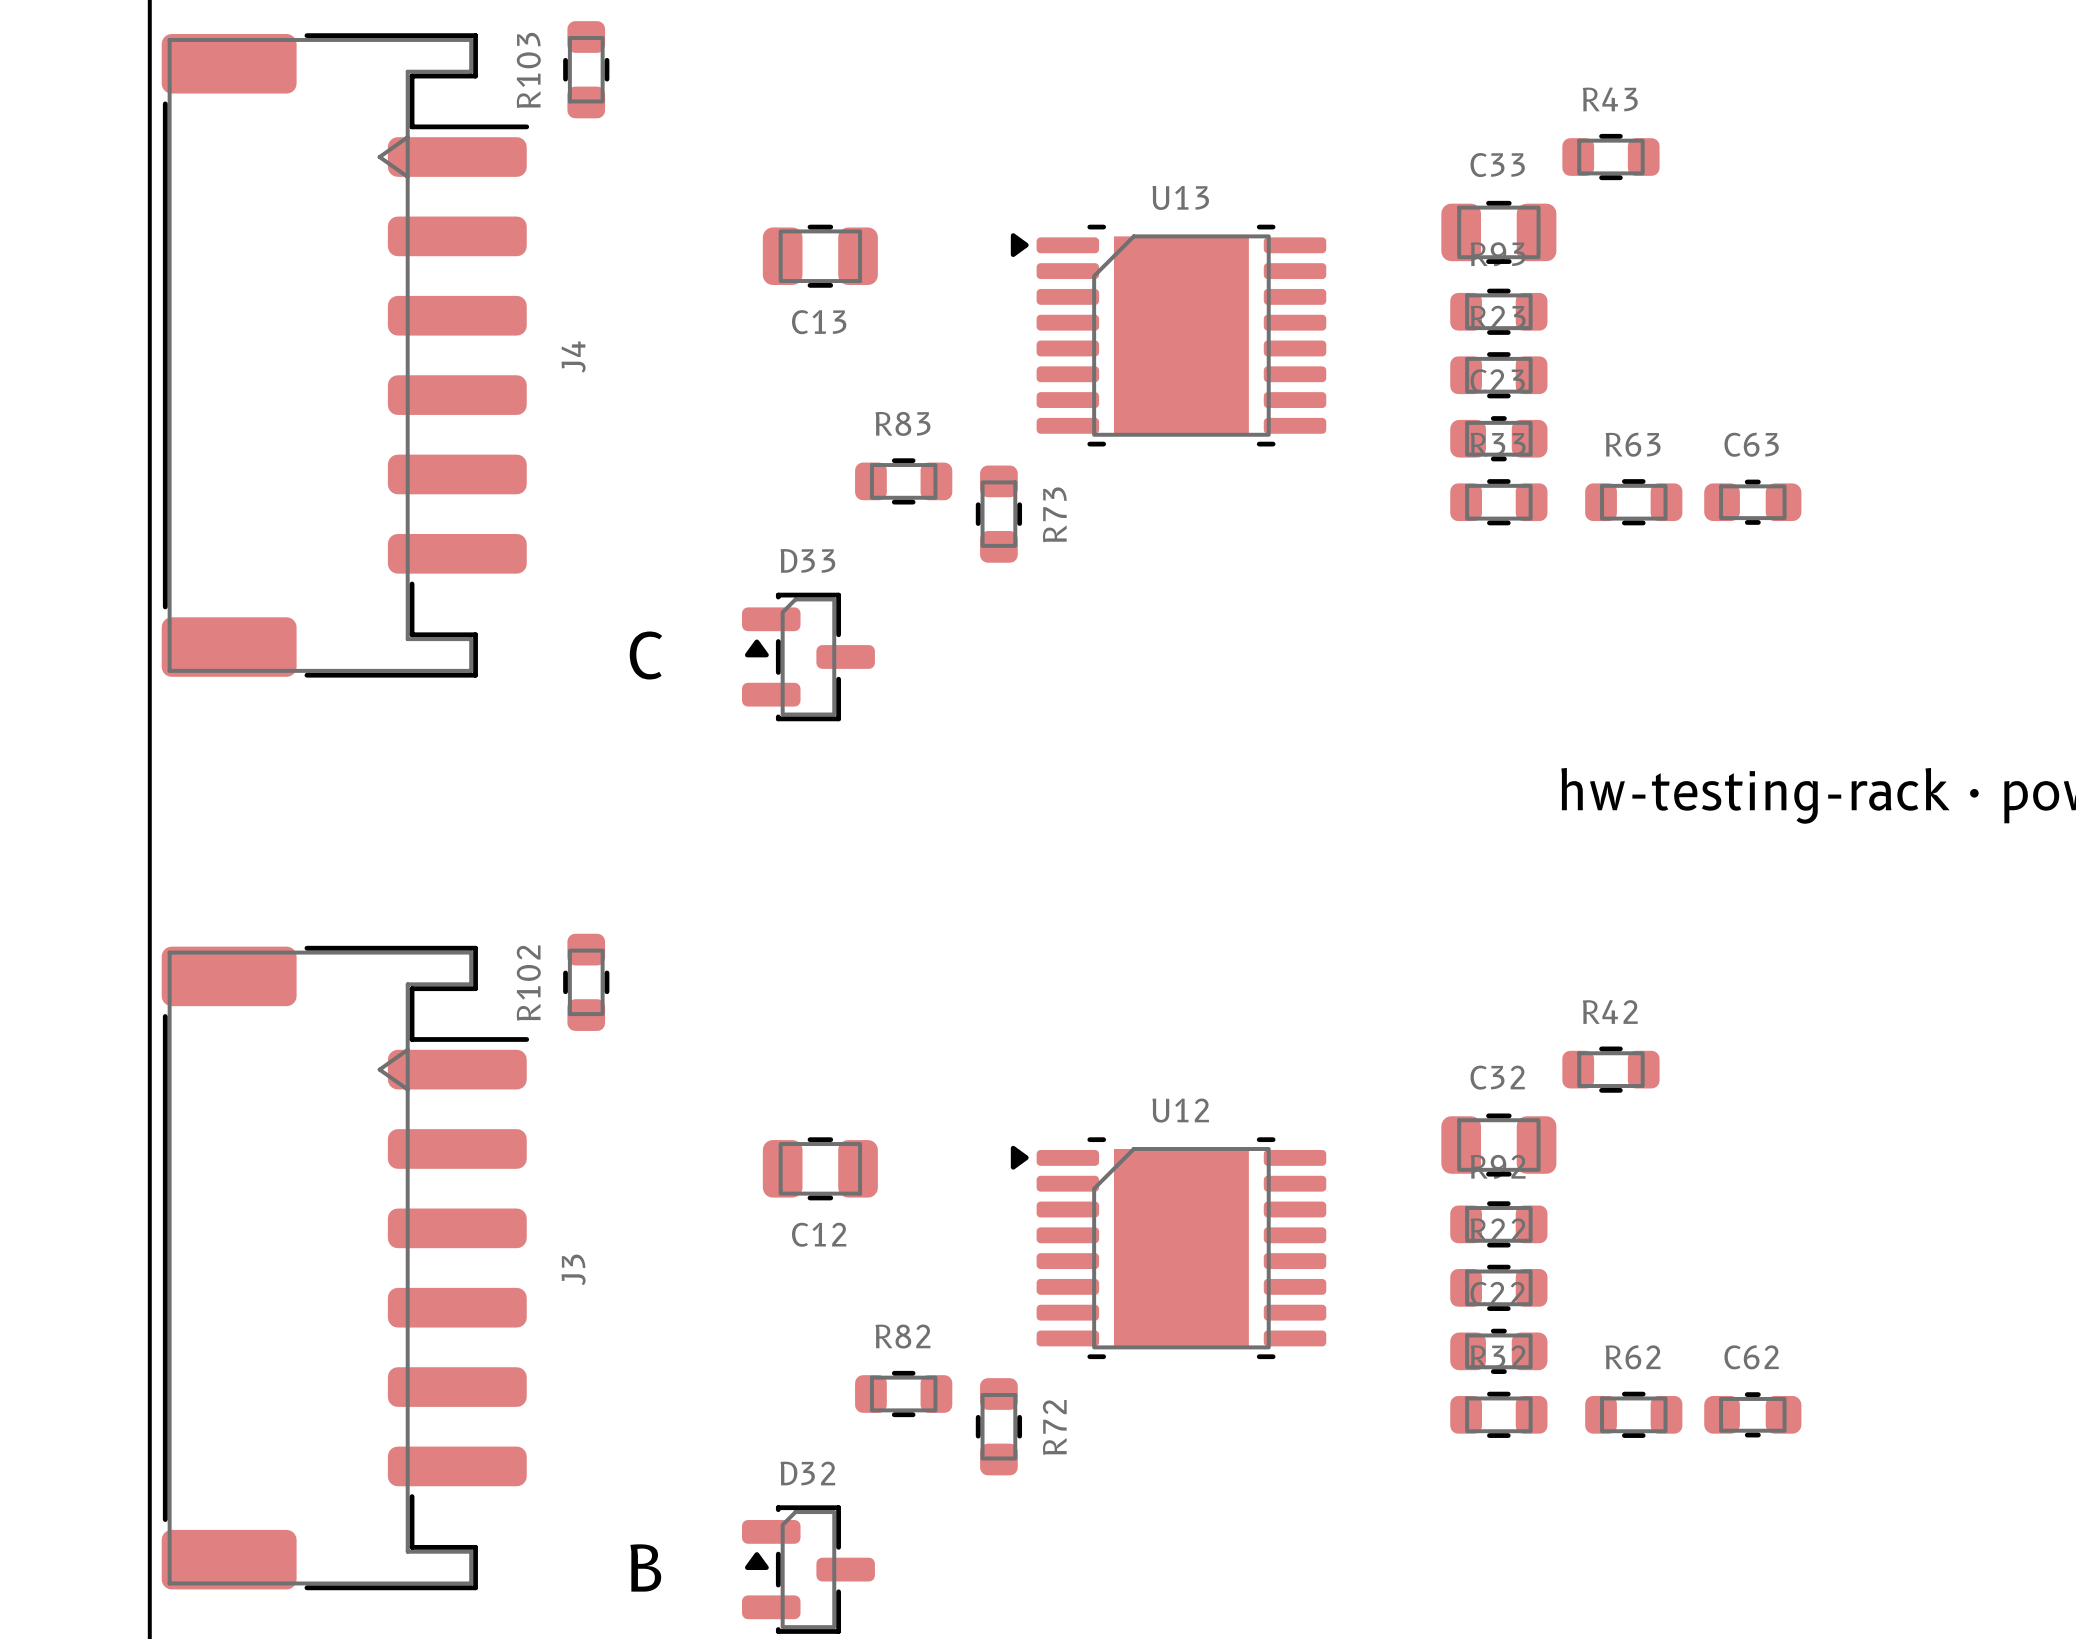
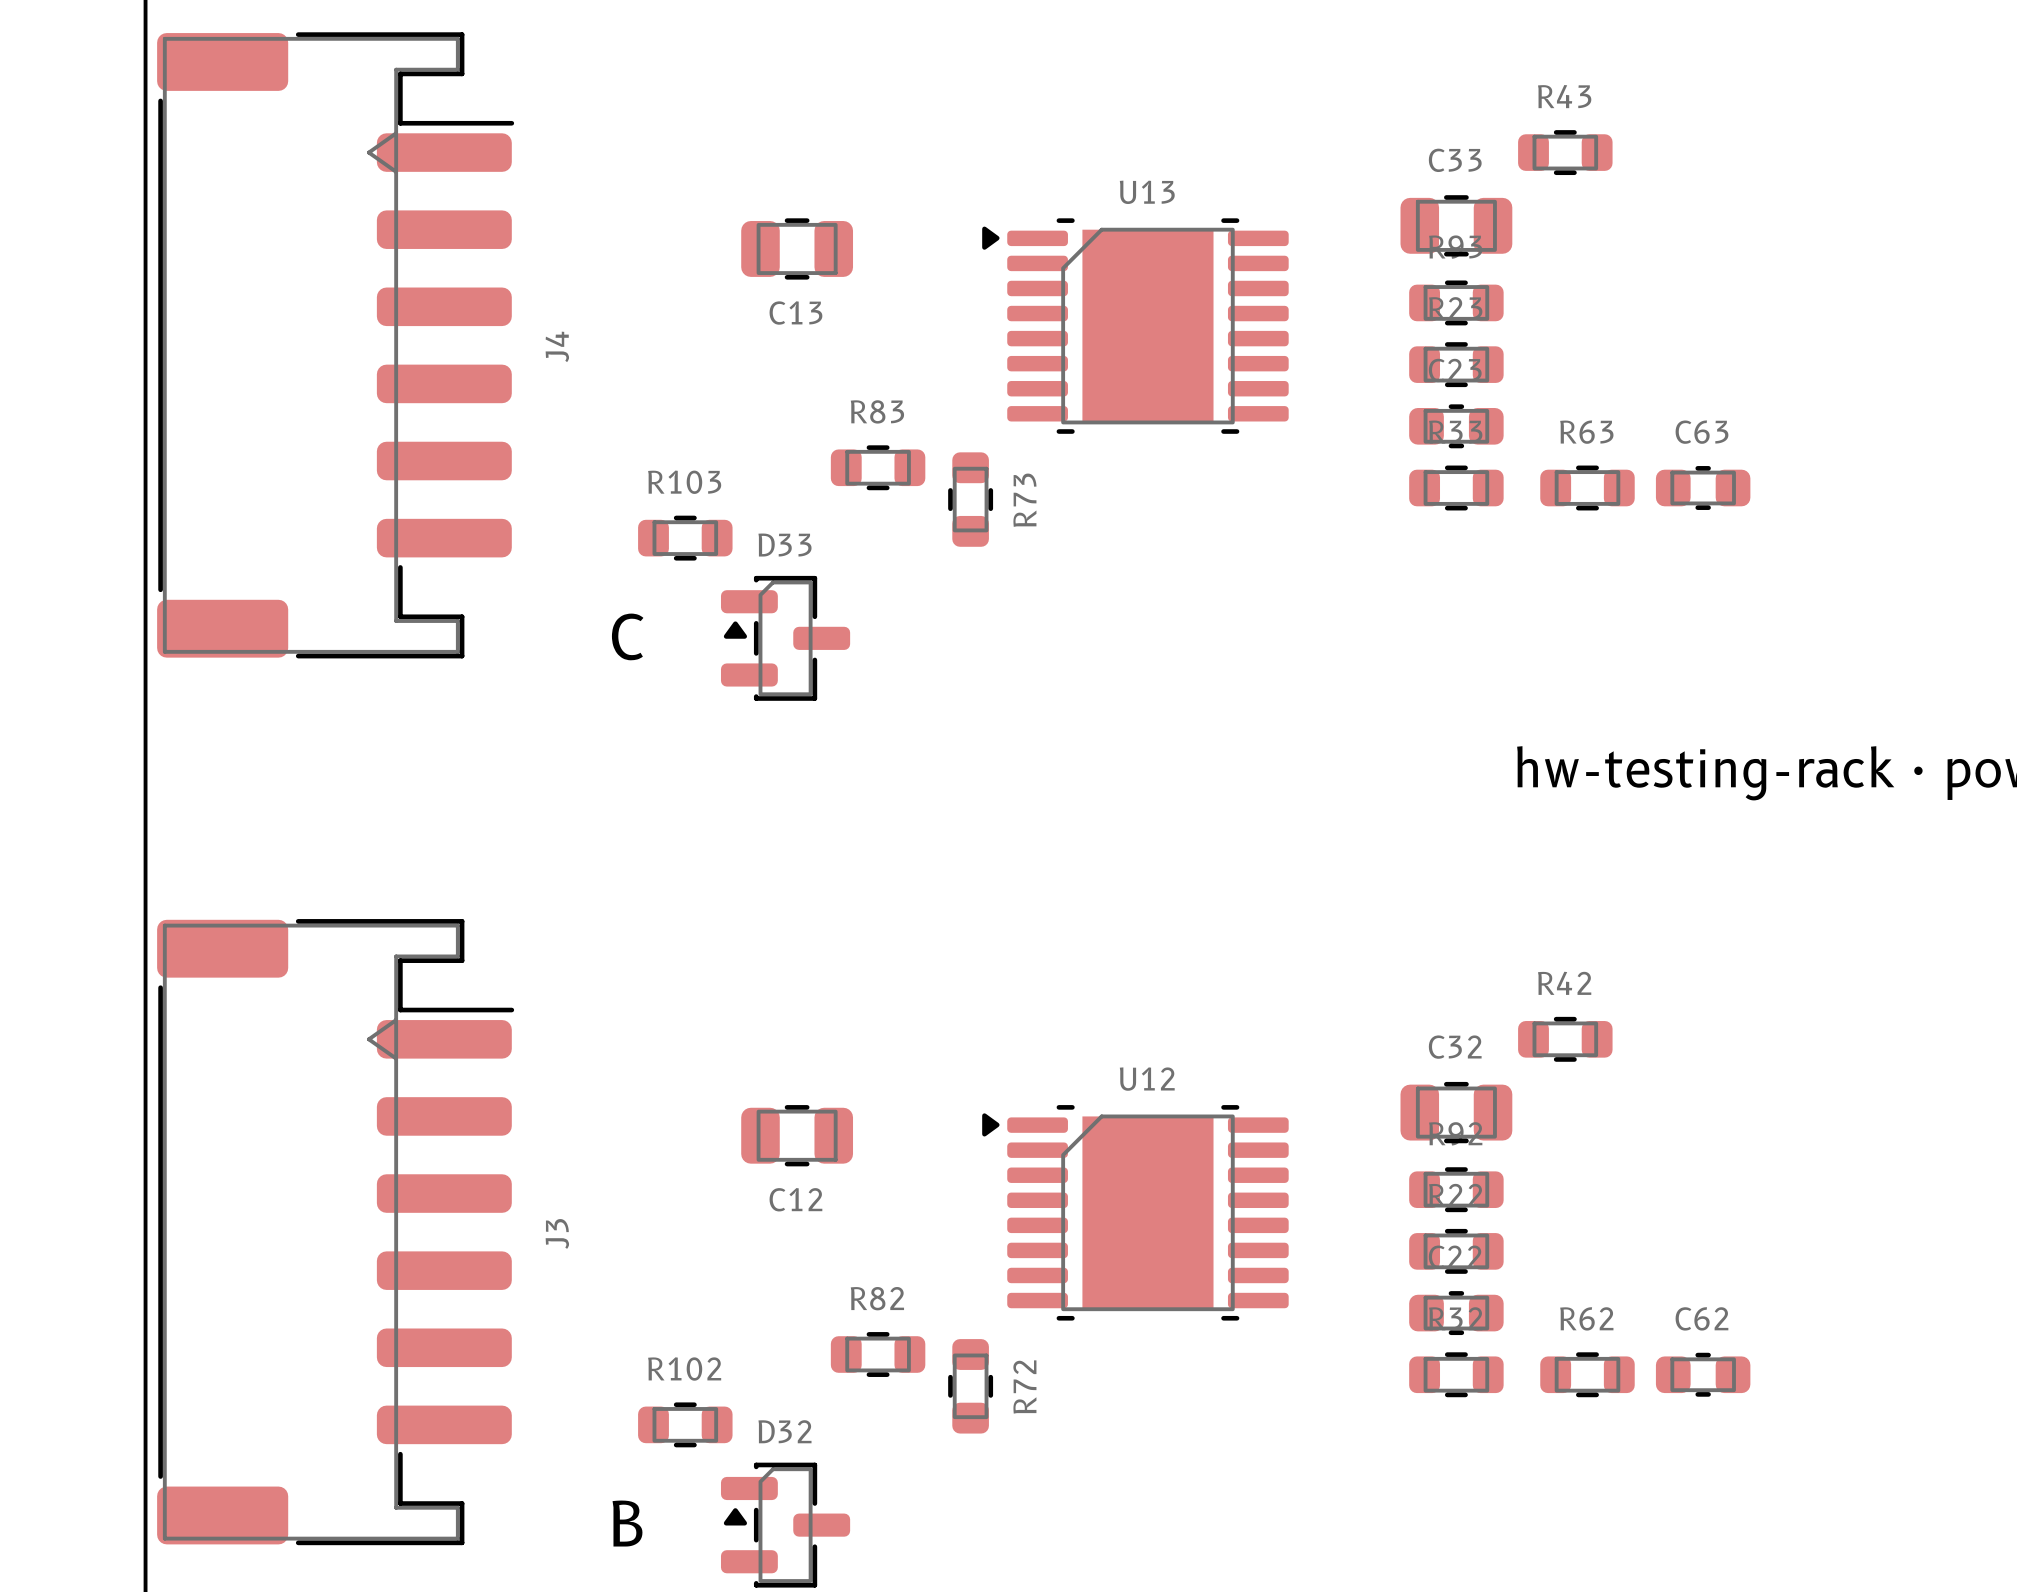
R103 rotation: 0° (586, 69) -> 90° clockwise (685, 538)
R103 position: (586, 69) -> (685, 538)
R102 rotation: 0° (586, 982) -> 90° clockwise (685, 1424)
R102 position: (586, 982) -> (685, 1424)

